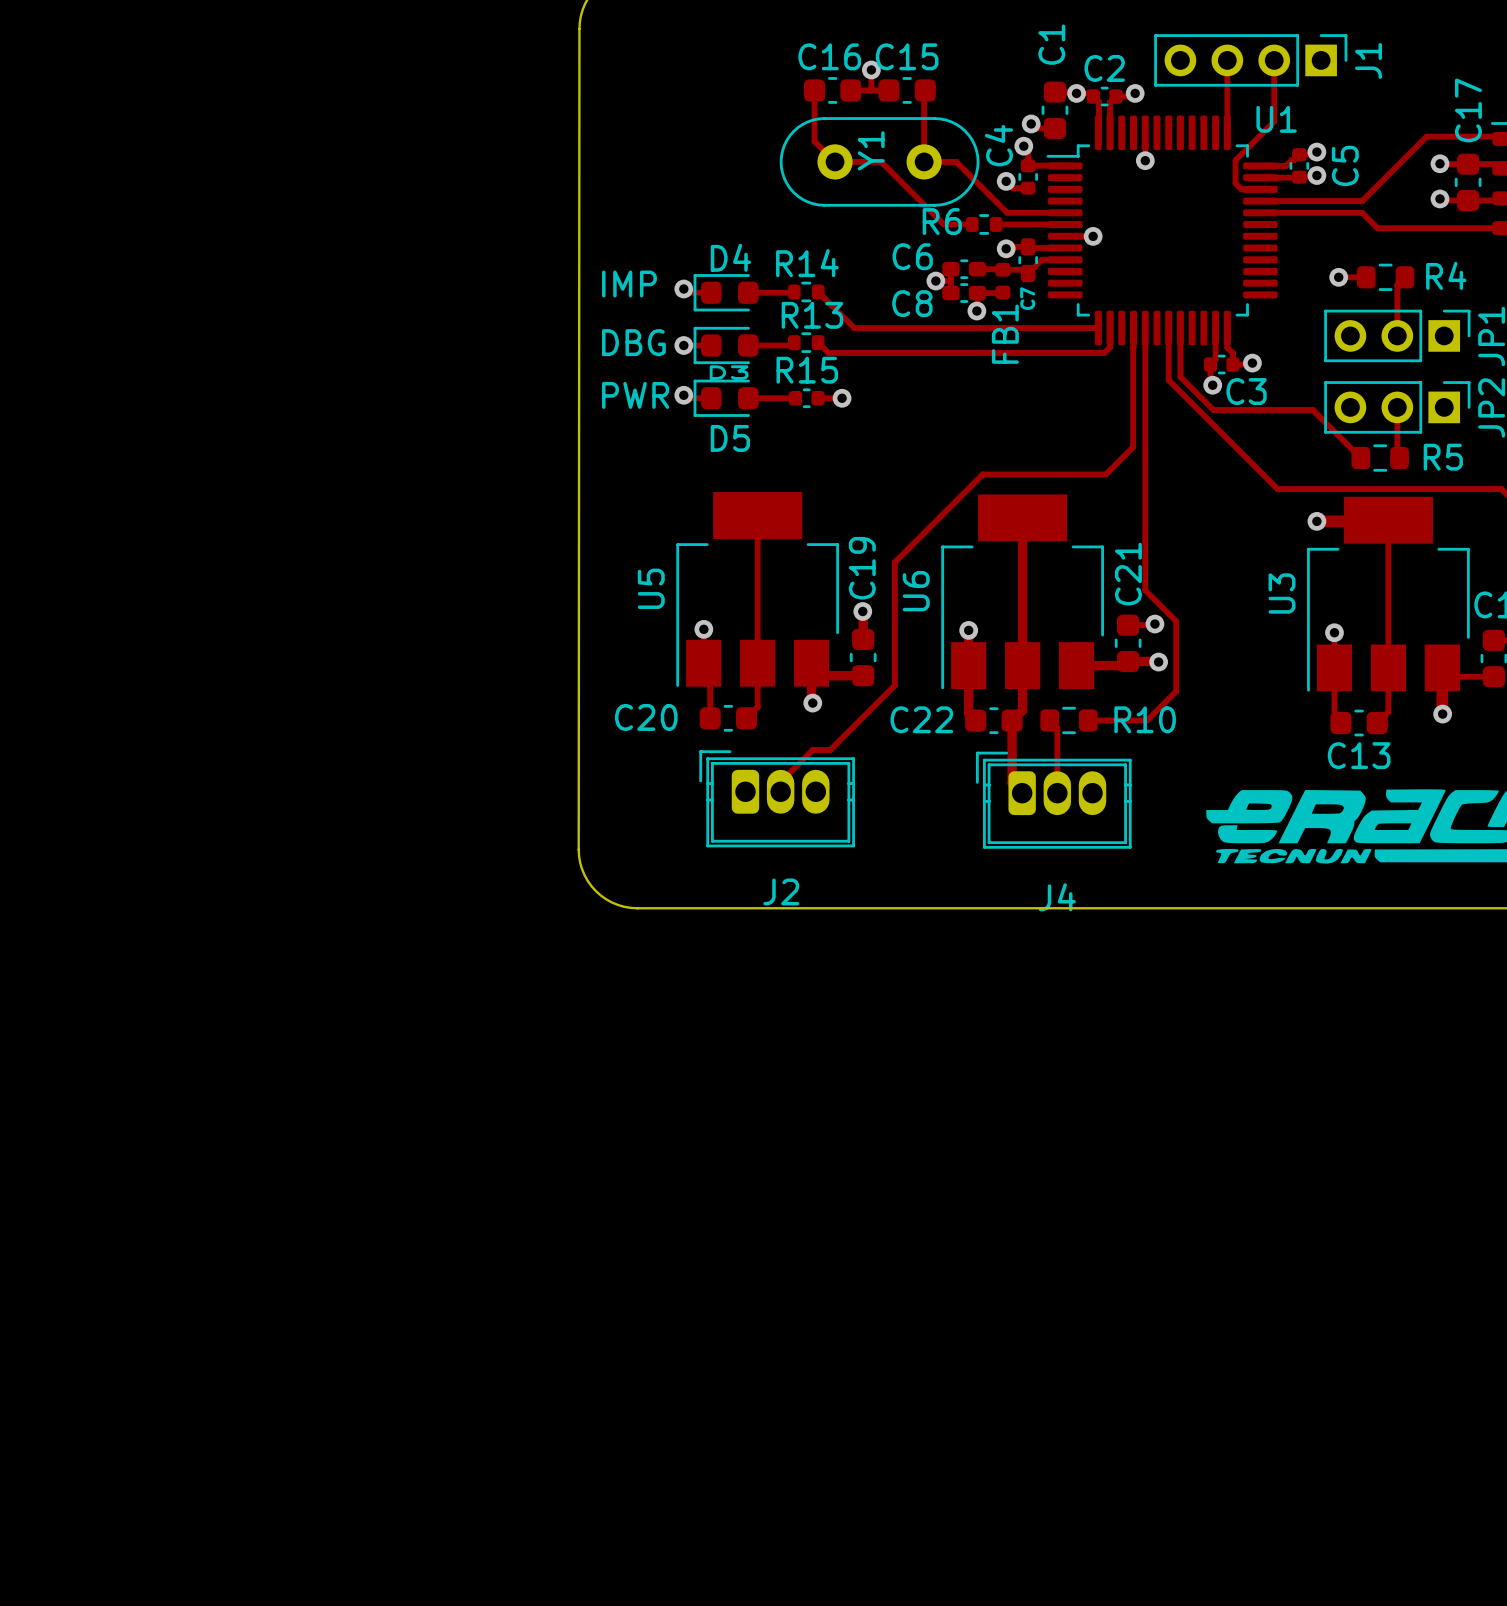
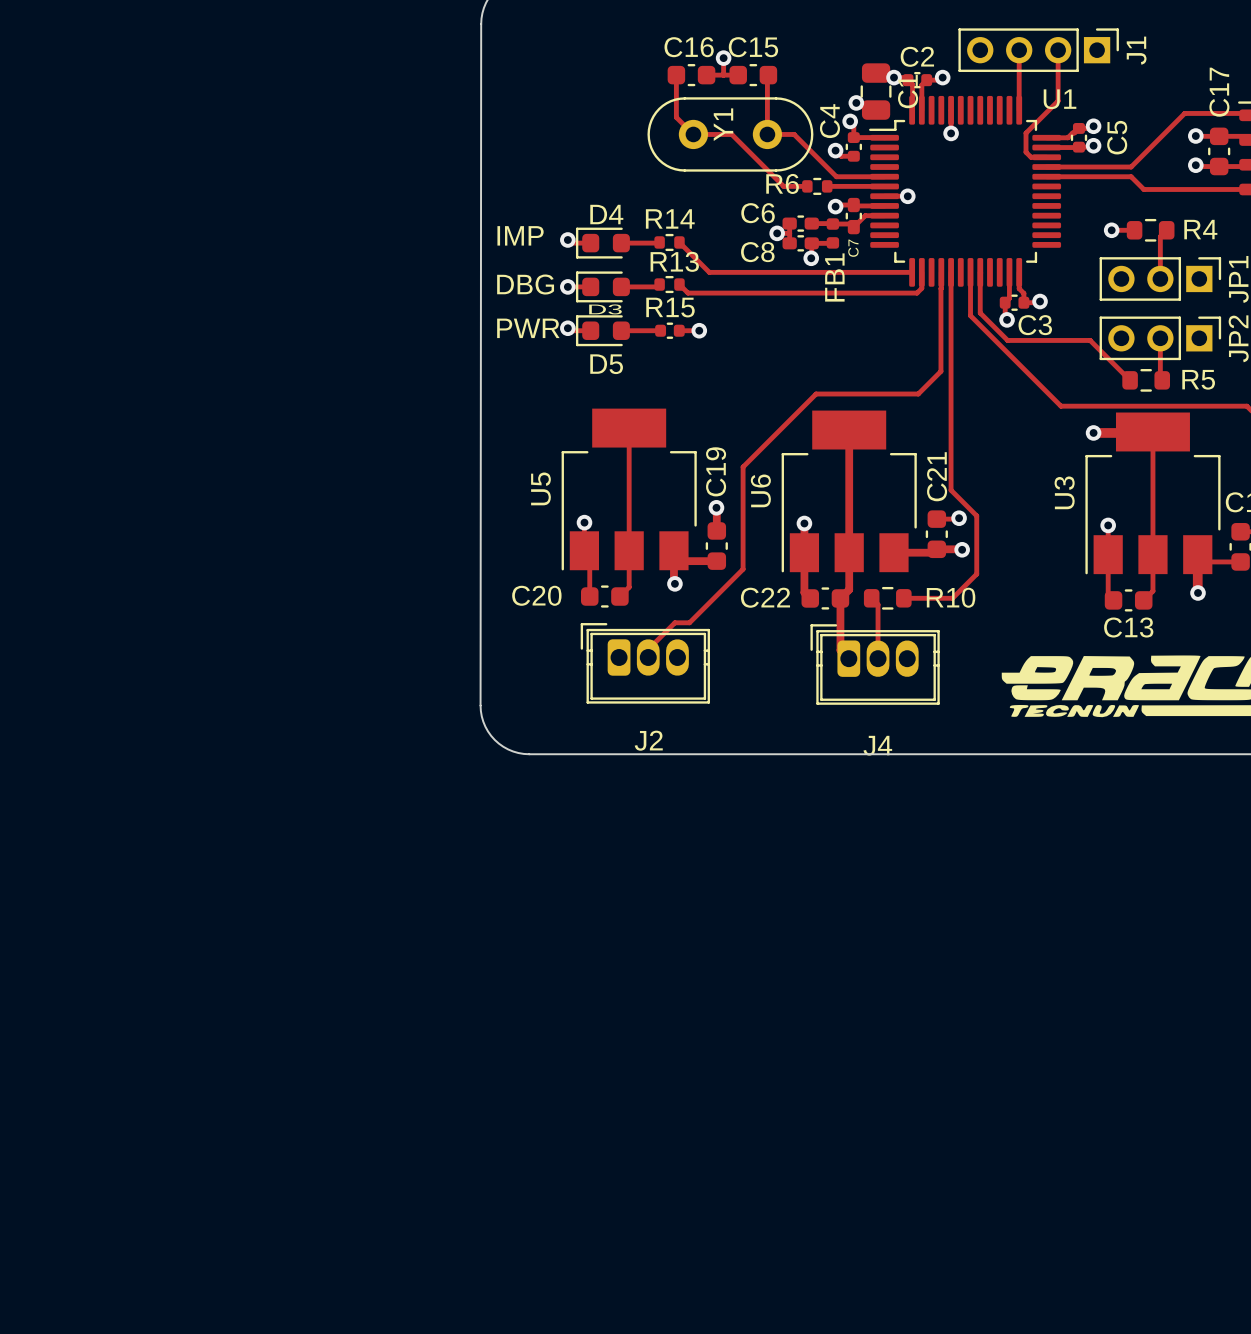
C1 name position: C1 (1051, 44) -> C1 (908, 91)
C1 footprint: [1041, 81, 1069, 139] -> [860, 63, 892, 120]

